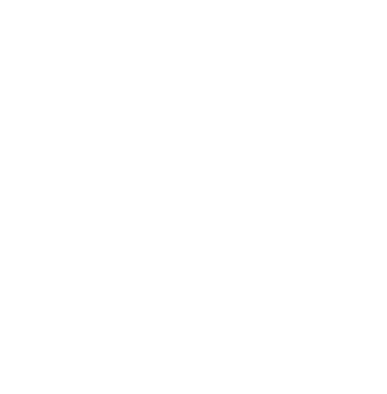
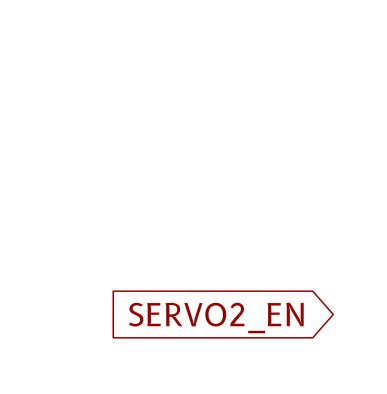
global label: none -> SERVO2_EN (216, 318)

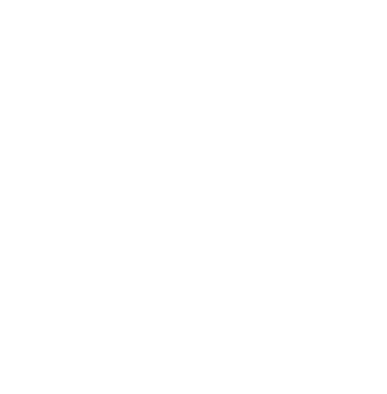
global label: SERVO2_EN (216, 318) -> none

